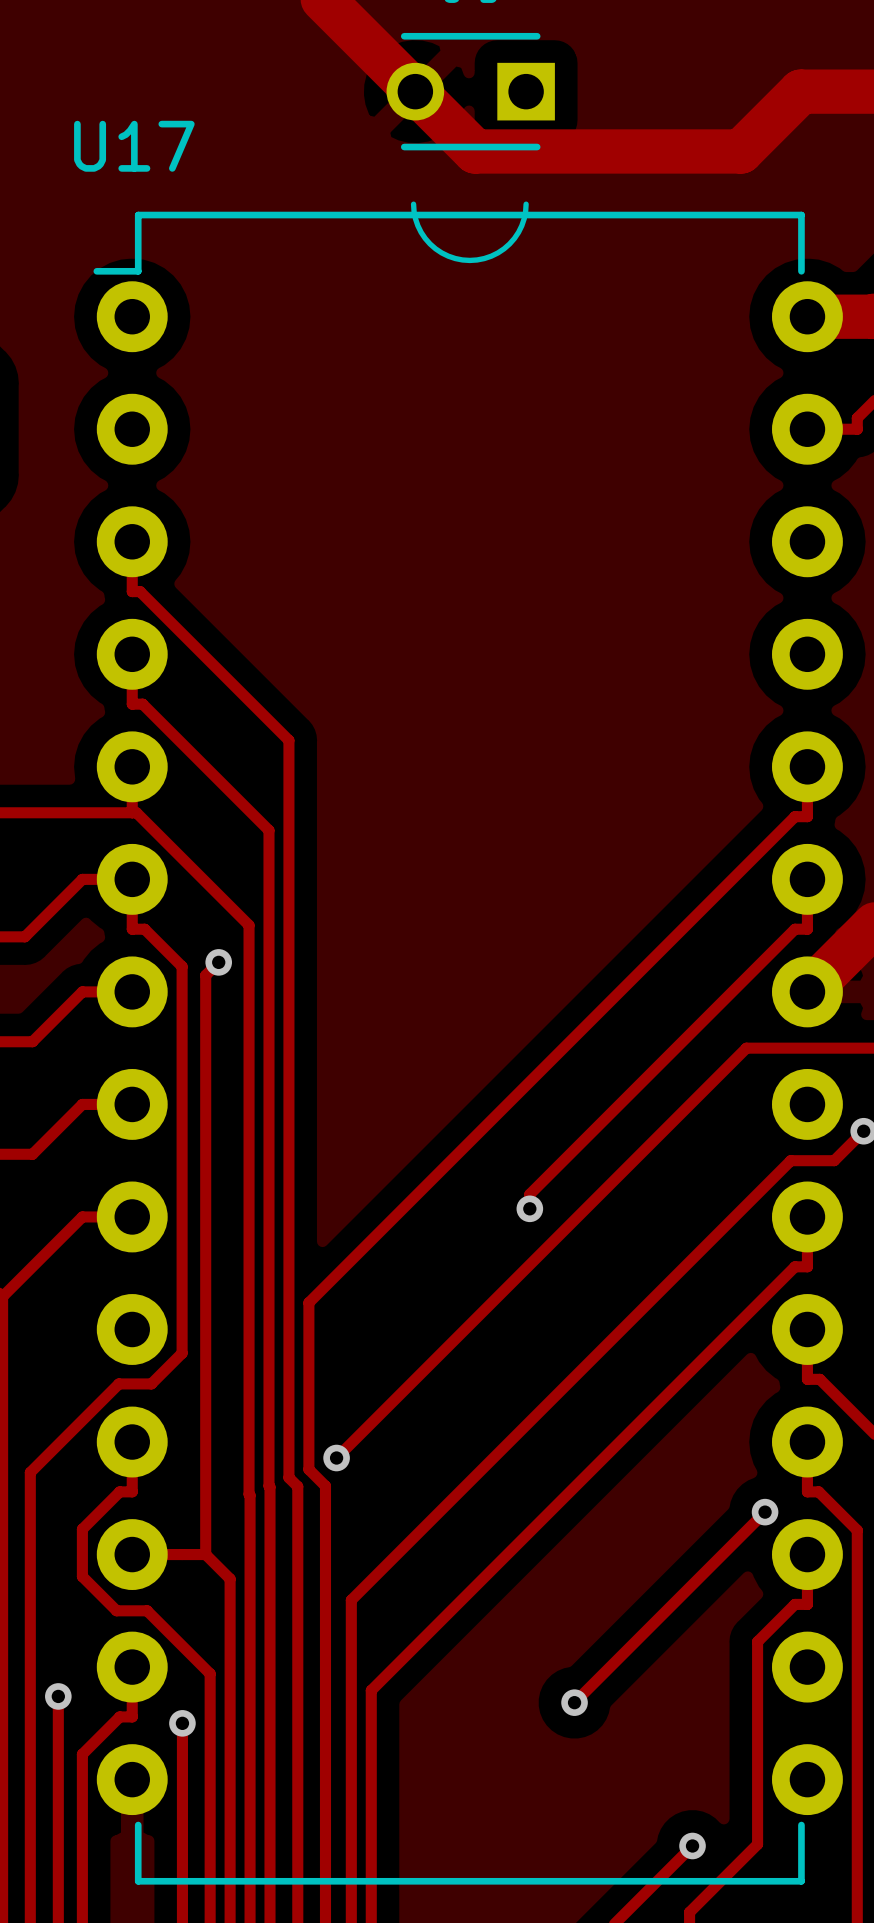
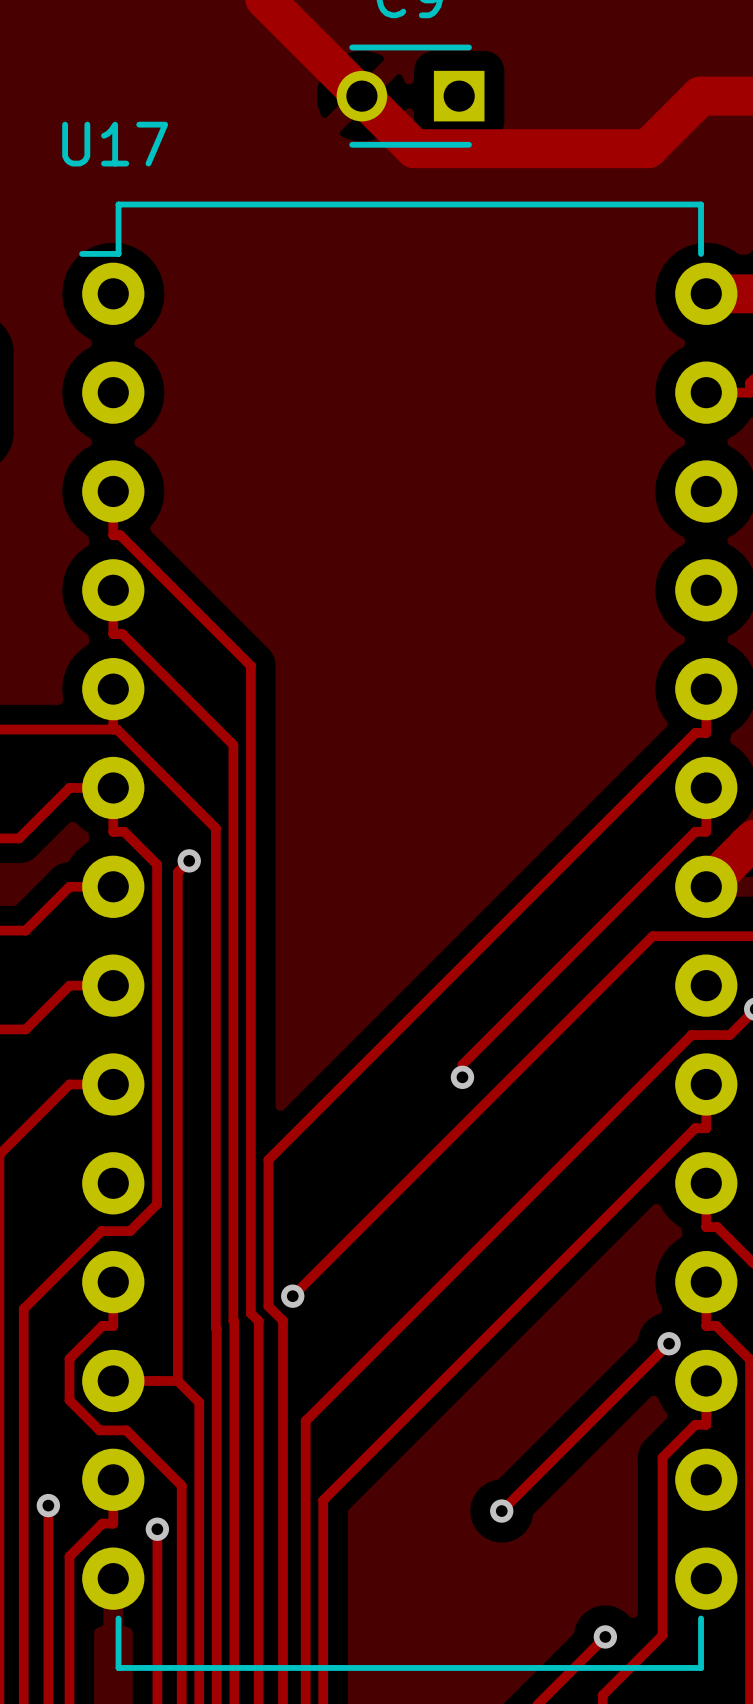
U17 footprint: [93, 201, 843, 1885] -> [79, 201, 738, 1671]

